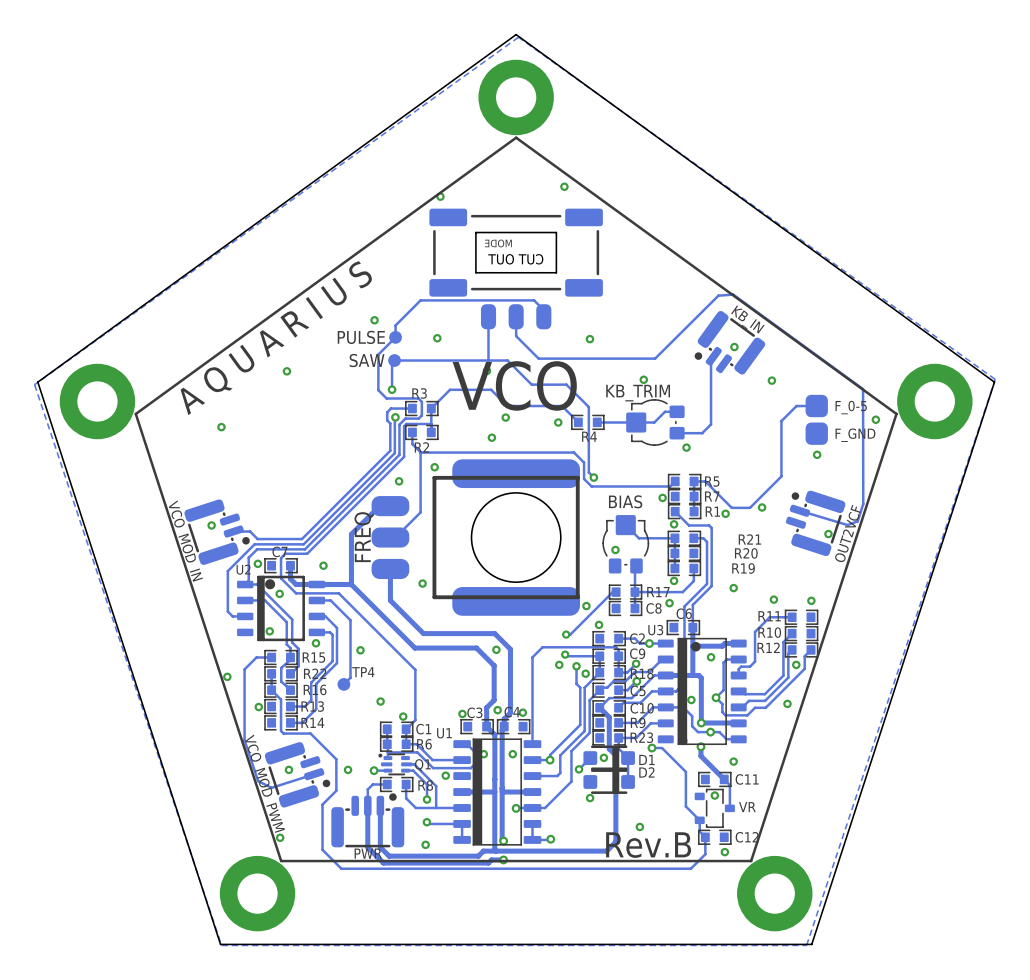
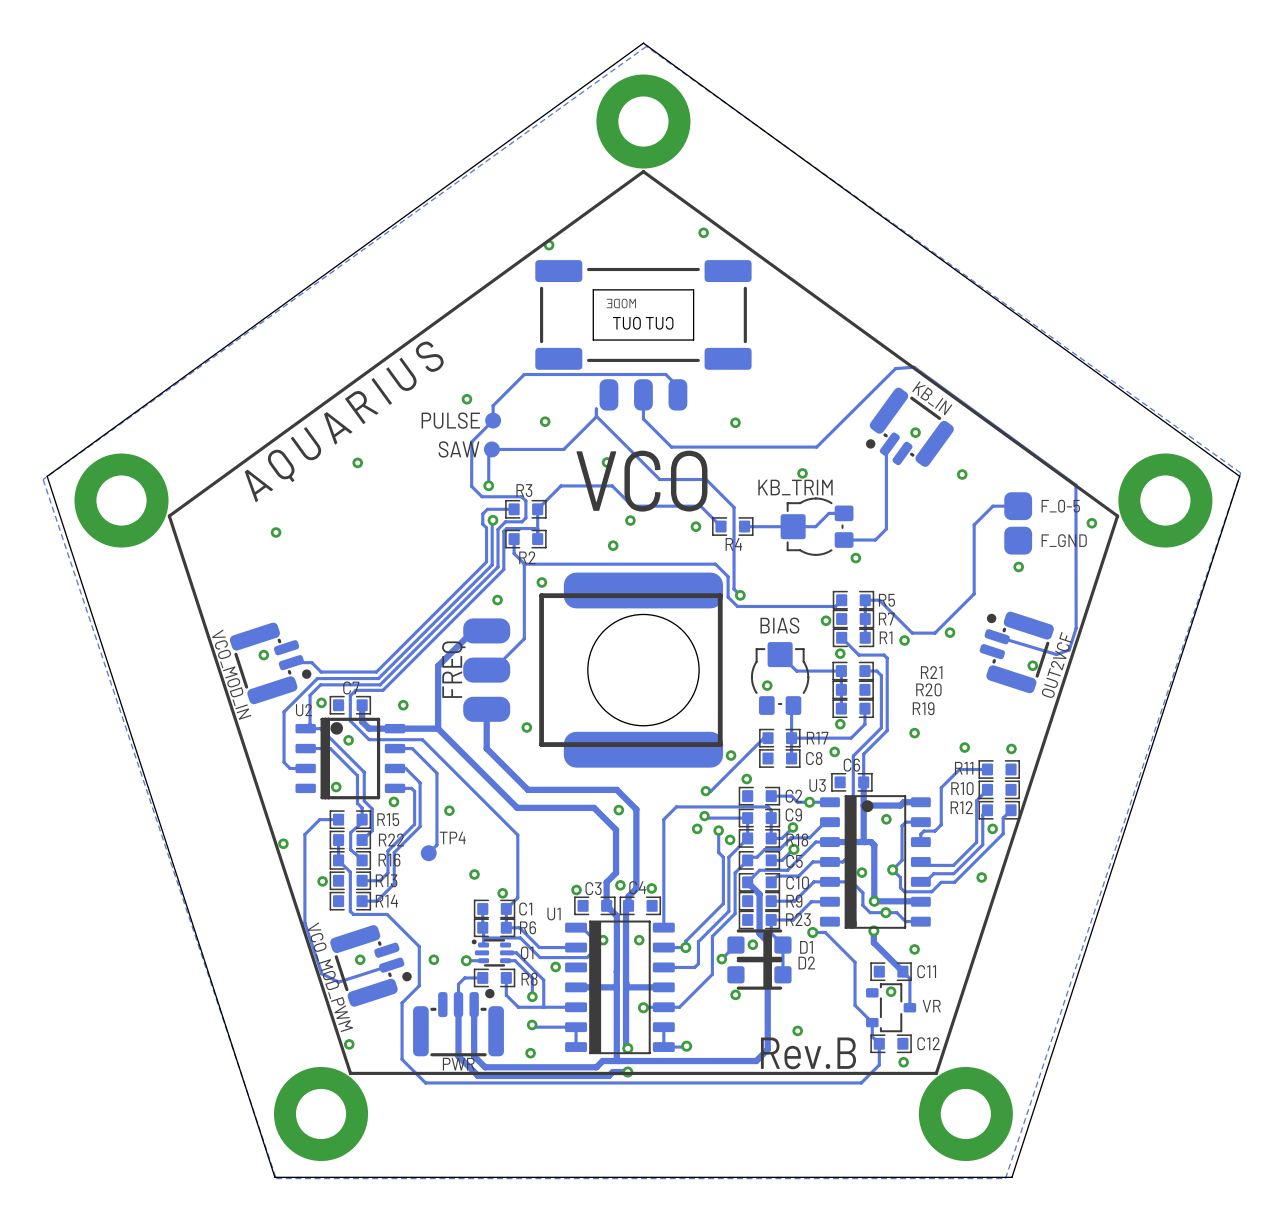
track: (488, 316) (488, 360) -> none
track: none -> (596, 408) (596, 416) (563, 449)
track: (452, 360) (507, 360) (531, 384) -> (596, 416) (659, 479) (662, 479)

